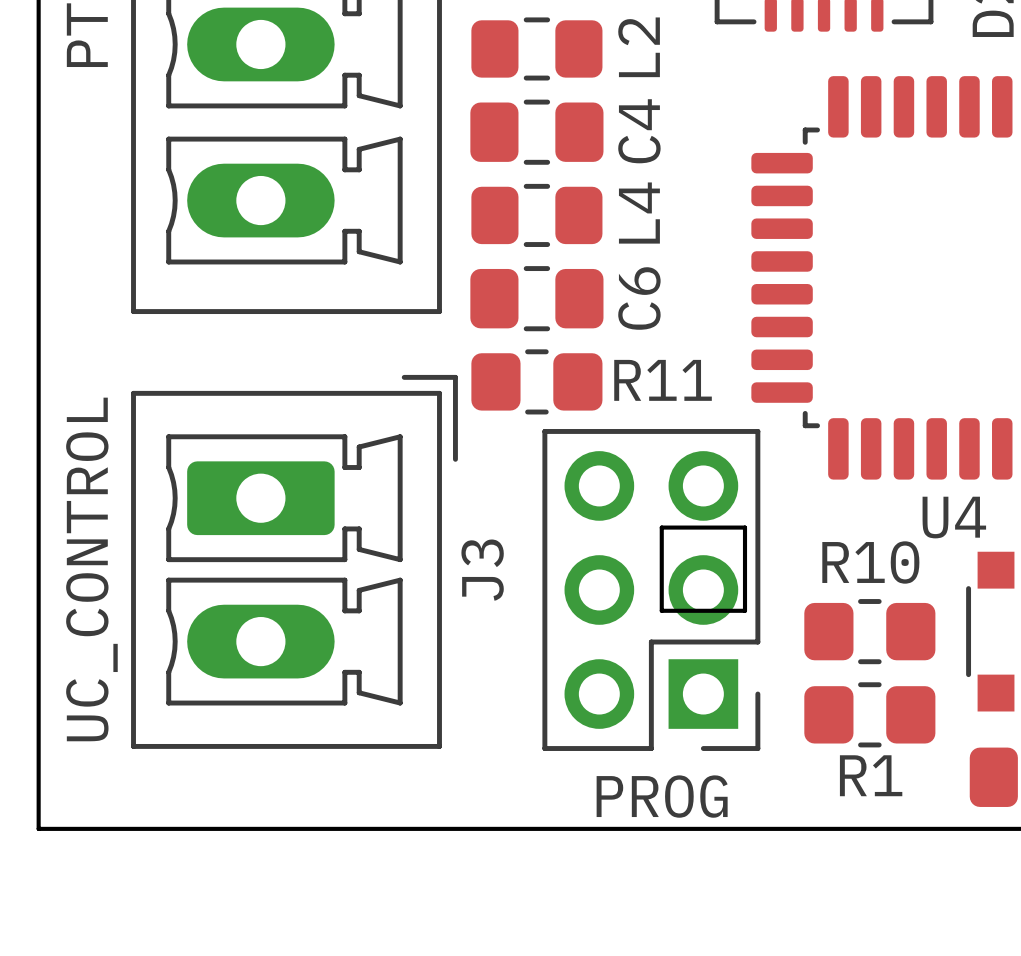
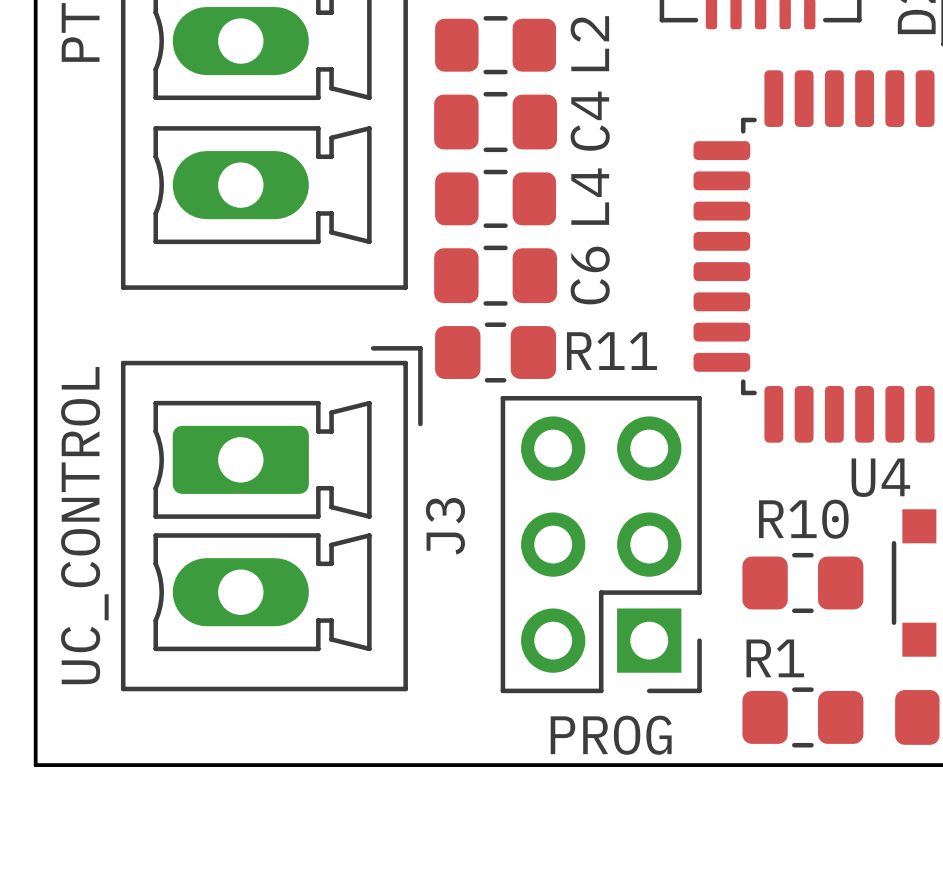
board edge: (661, 527) (745, 527) (745, 610) (661, 610) (661, 527) -> none
R1 position: (869, 714) -> (802, 717)
R1 name position: R1 (871, 775) -> R1 (775, 658)

